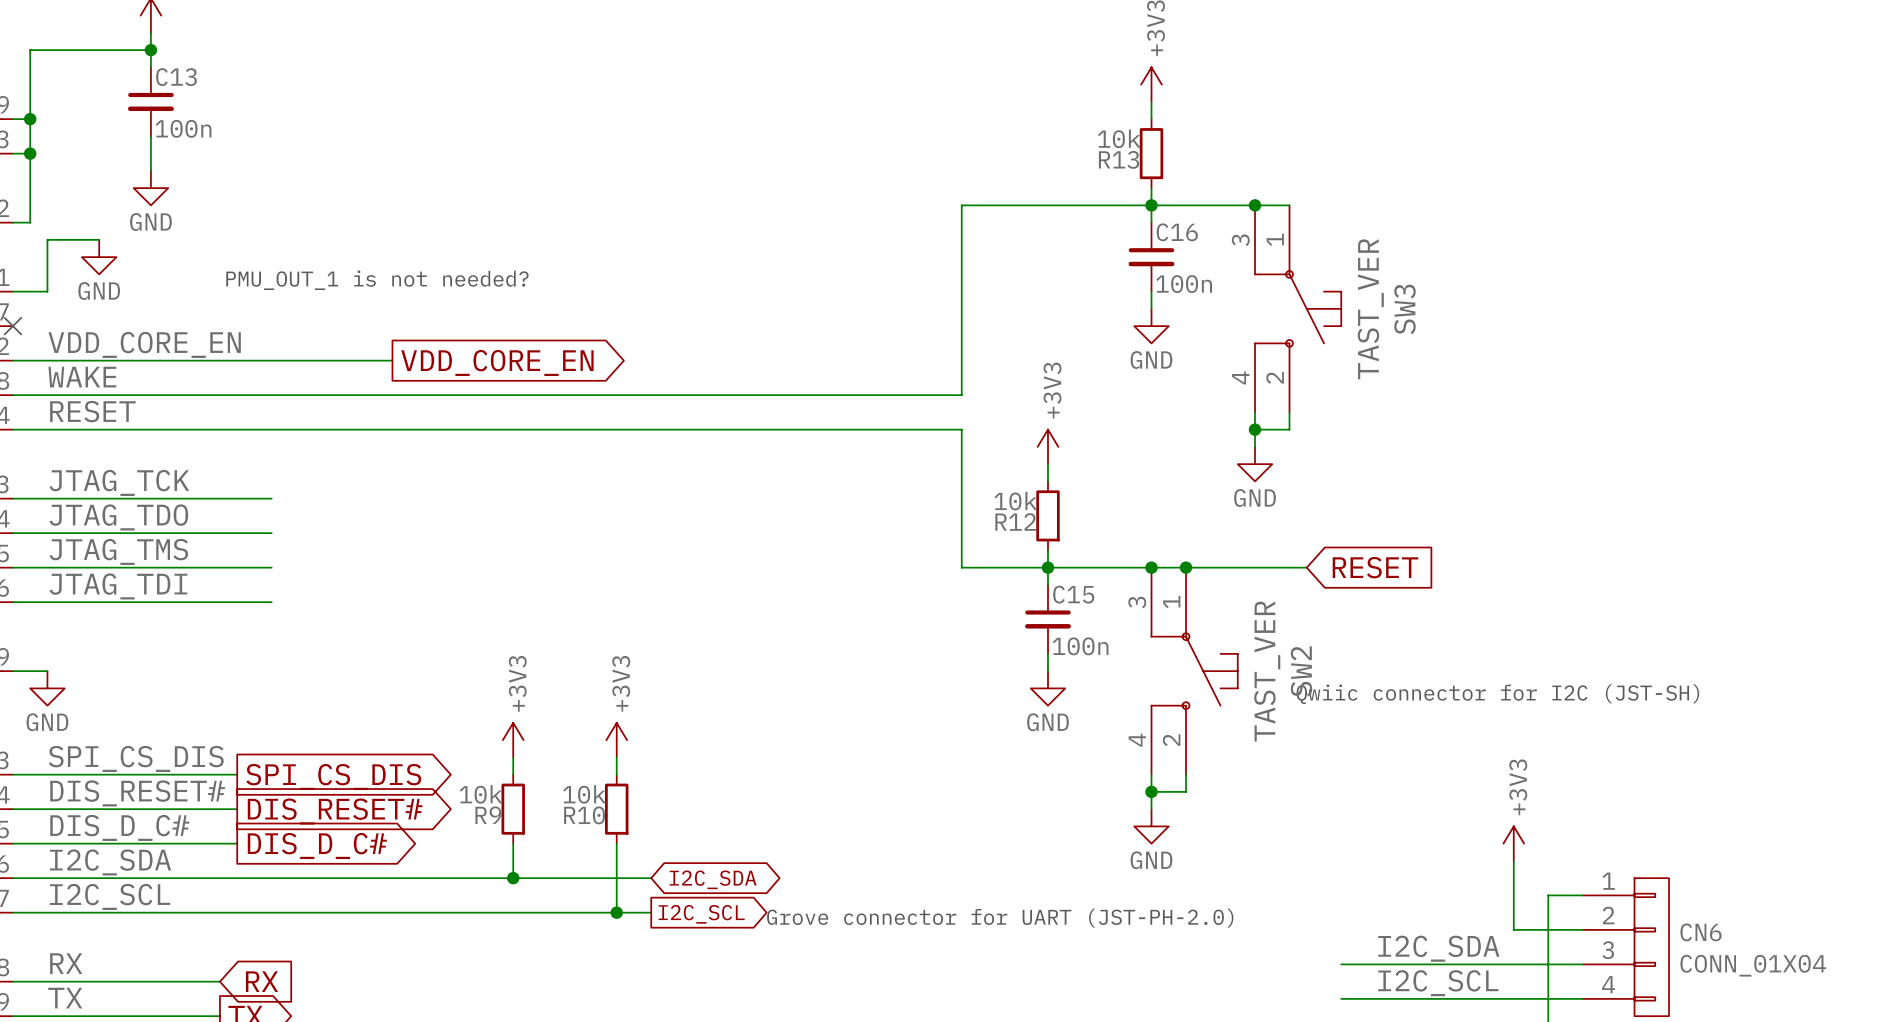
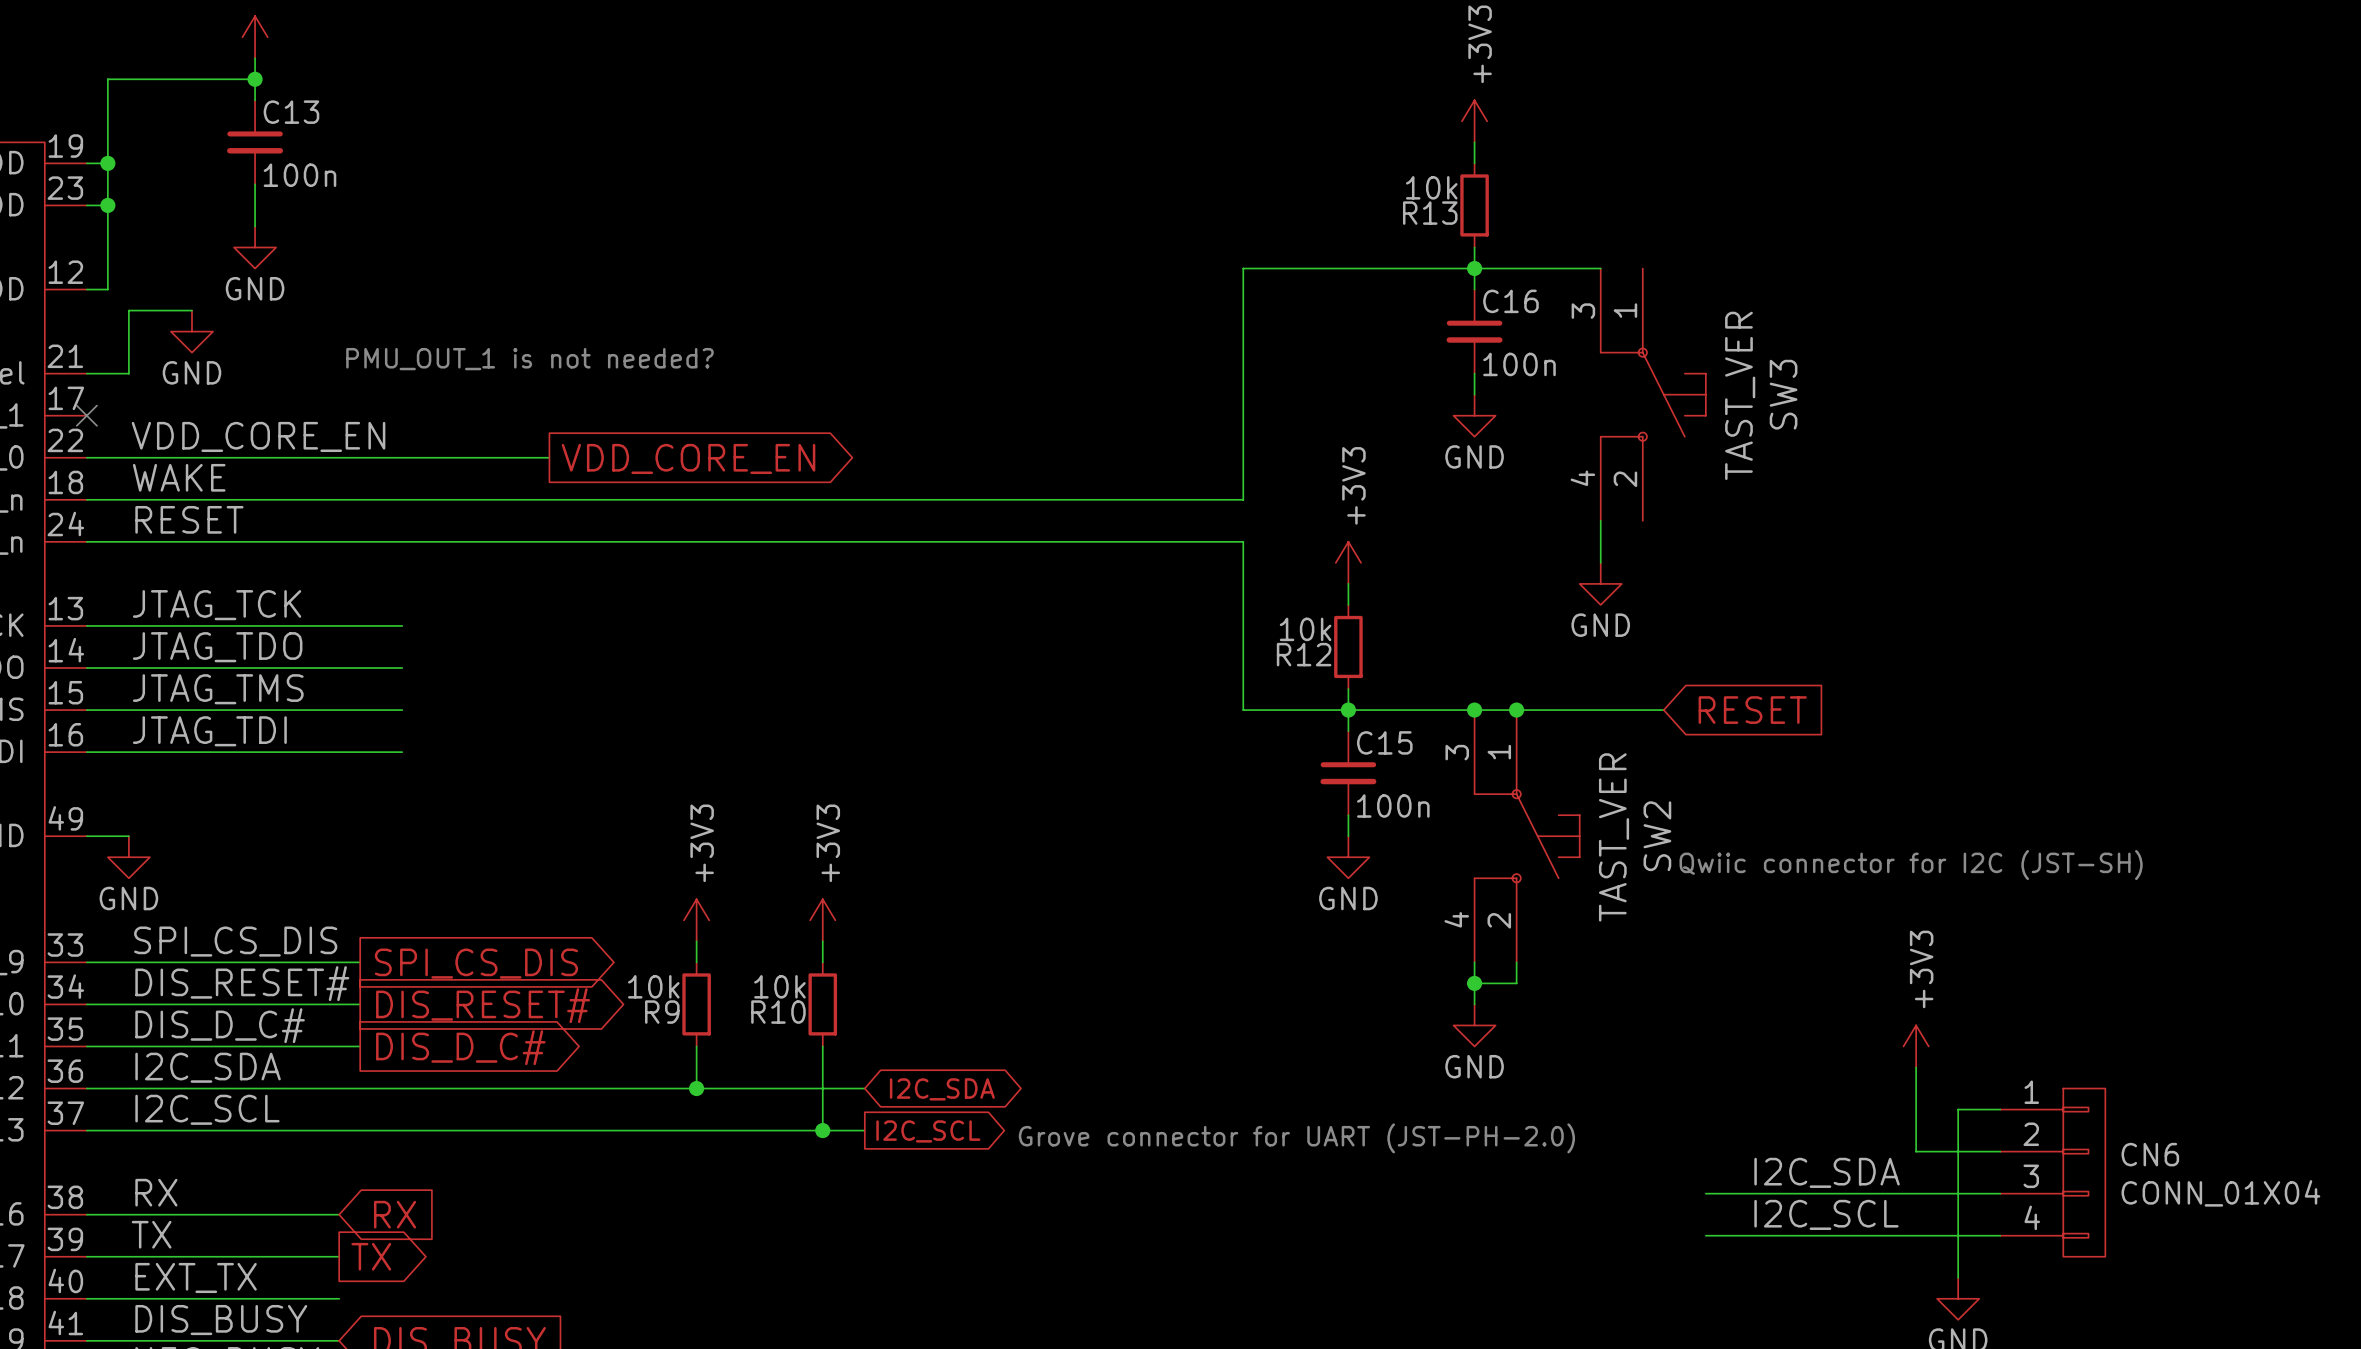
wire: (1255, 205) (1289, 205) -> none
junction: (1255, 205) -> none
wire: (1289, 412) (1289, 429) (1255, 429) -> none
junction: (1255, 429) -> none

